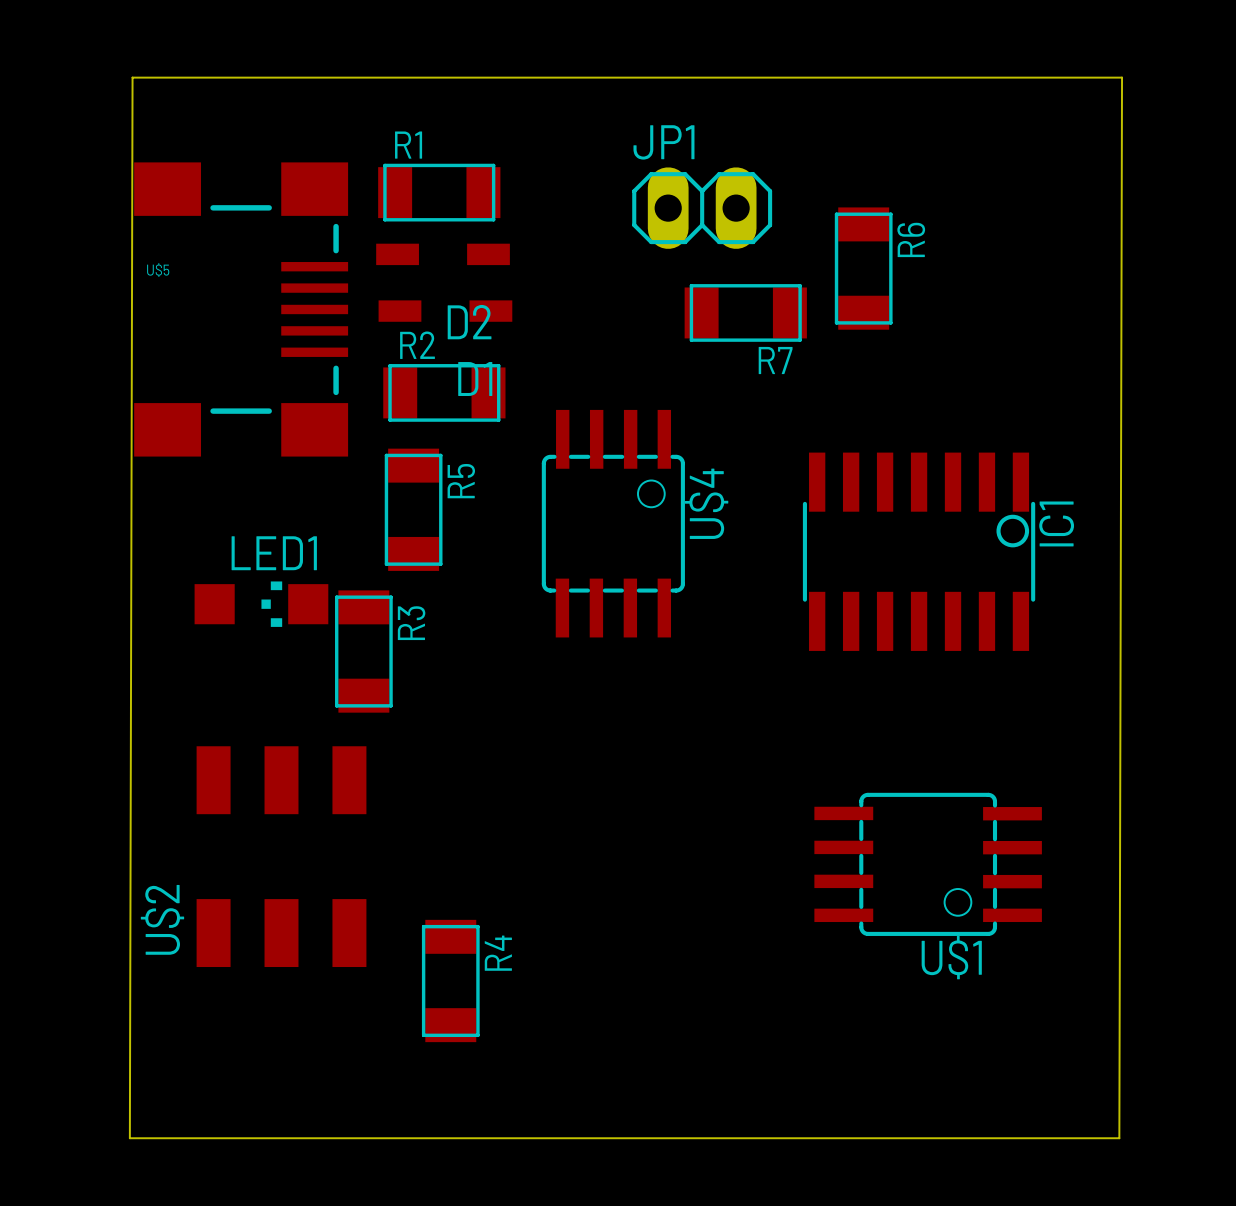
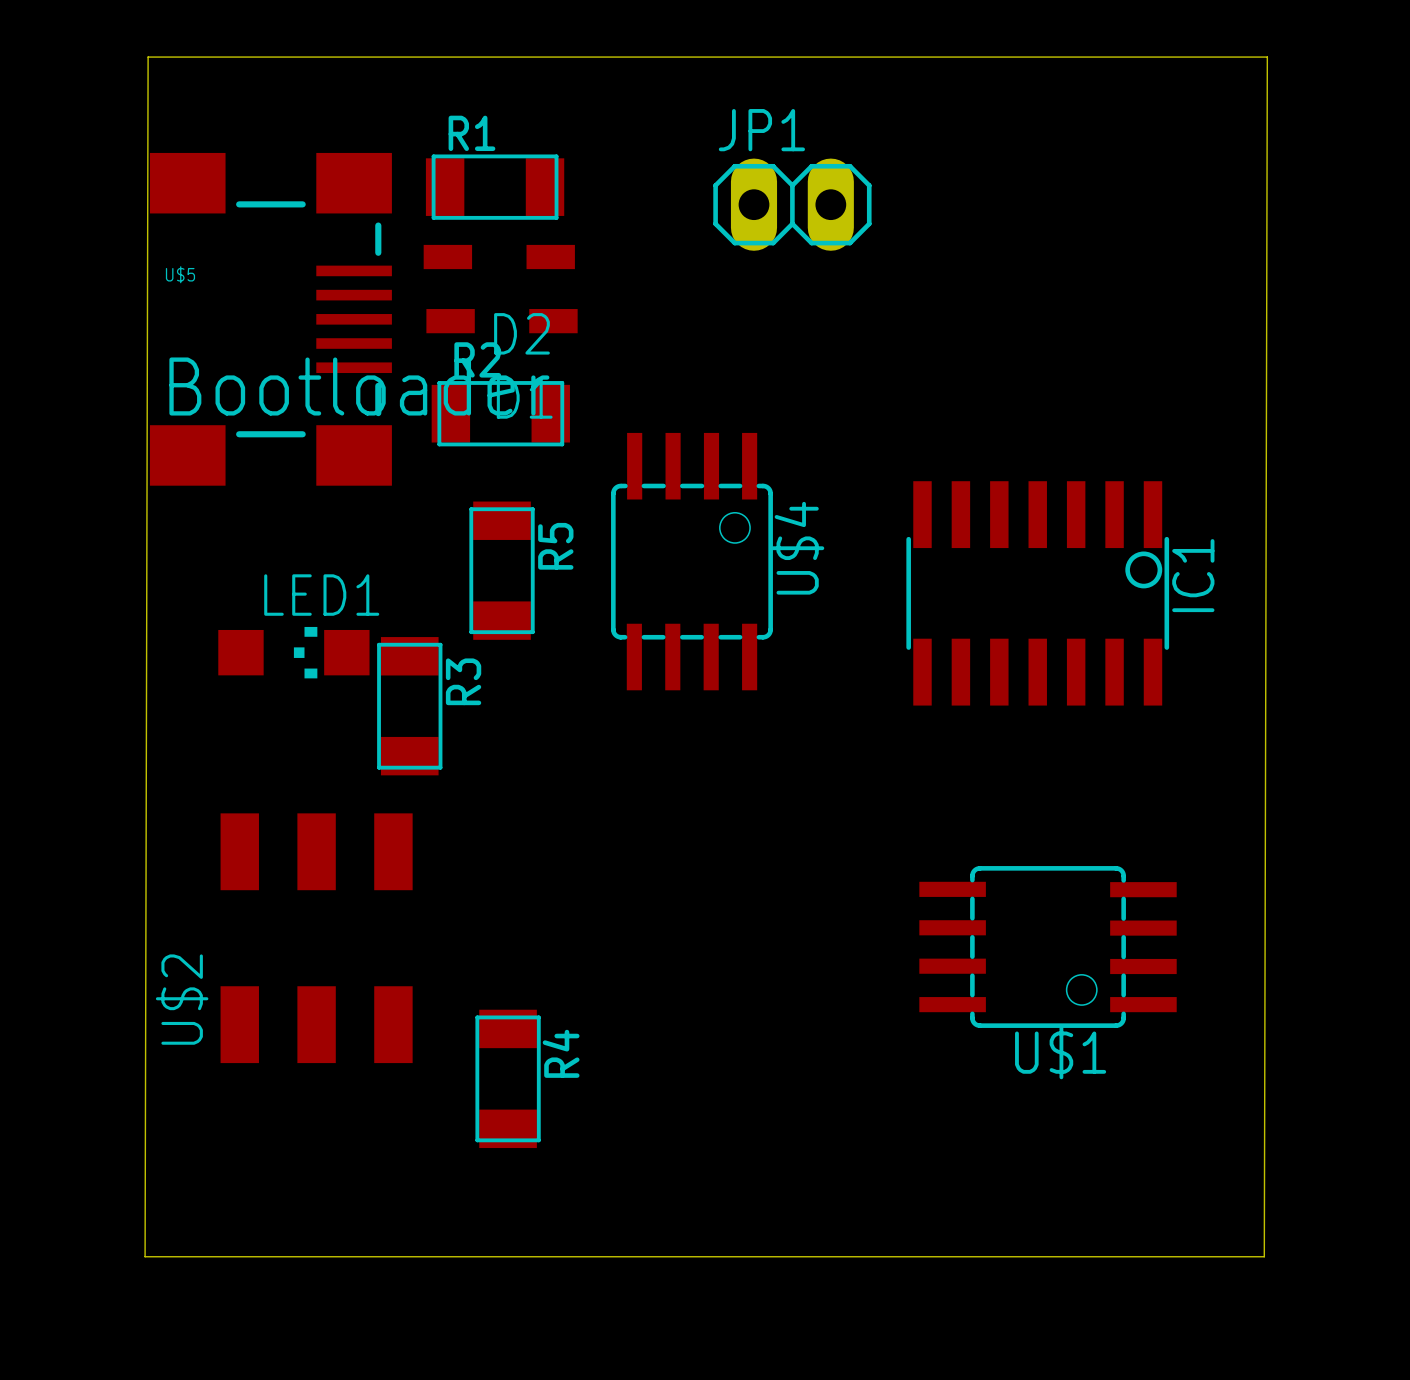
R6: (863, 268) -> none
R7: (745, 312) -> none
text: none -> Bootloader (359, 386)
R5 position: (413, 509) -> (502, 570)

